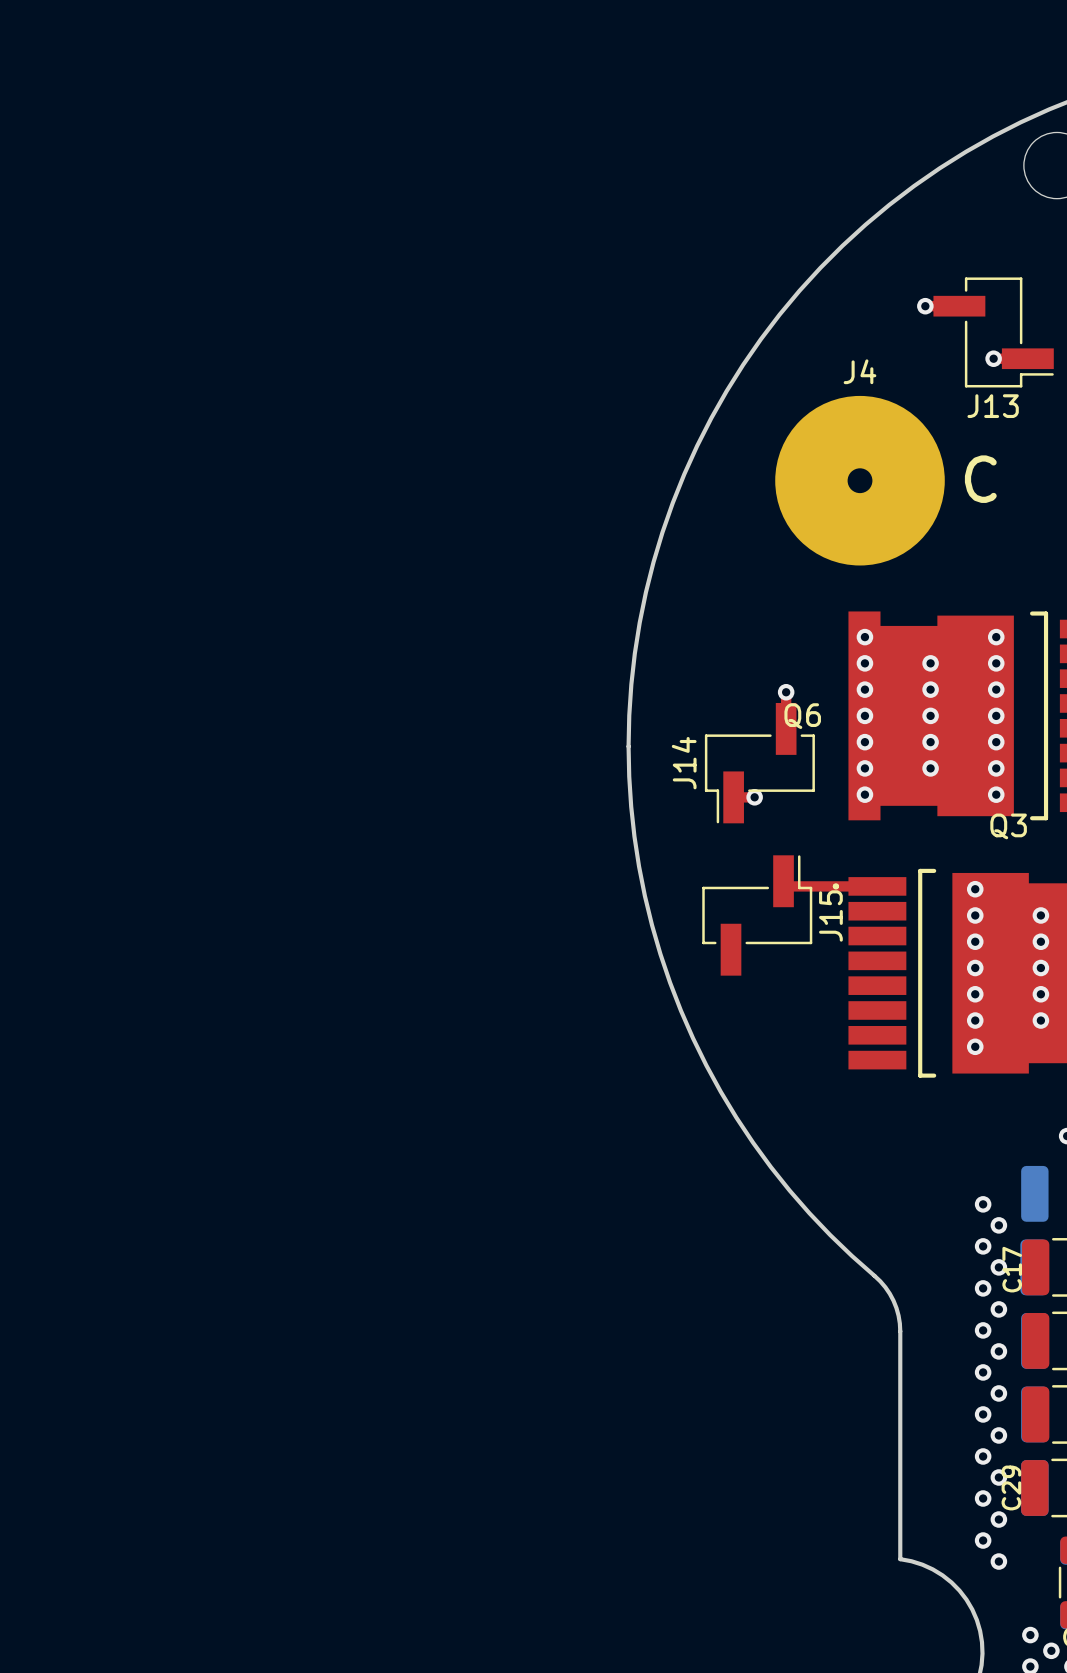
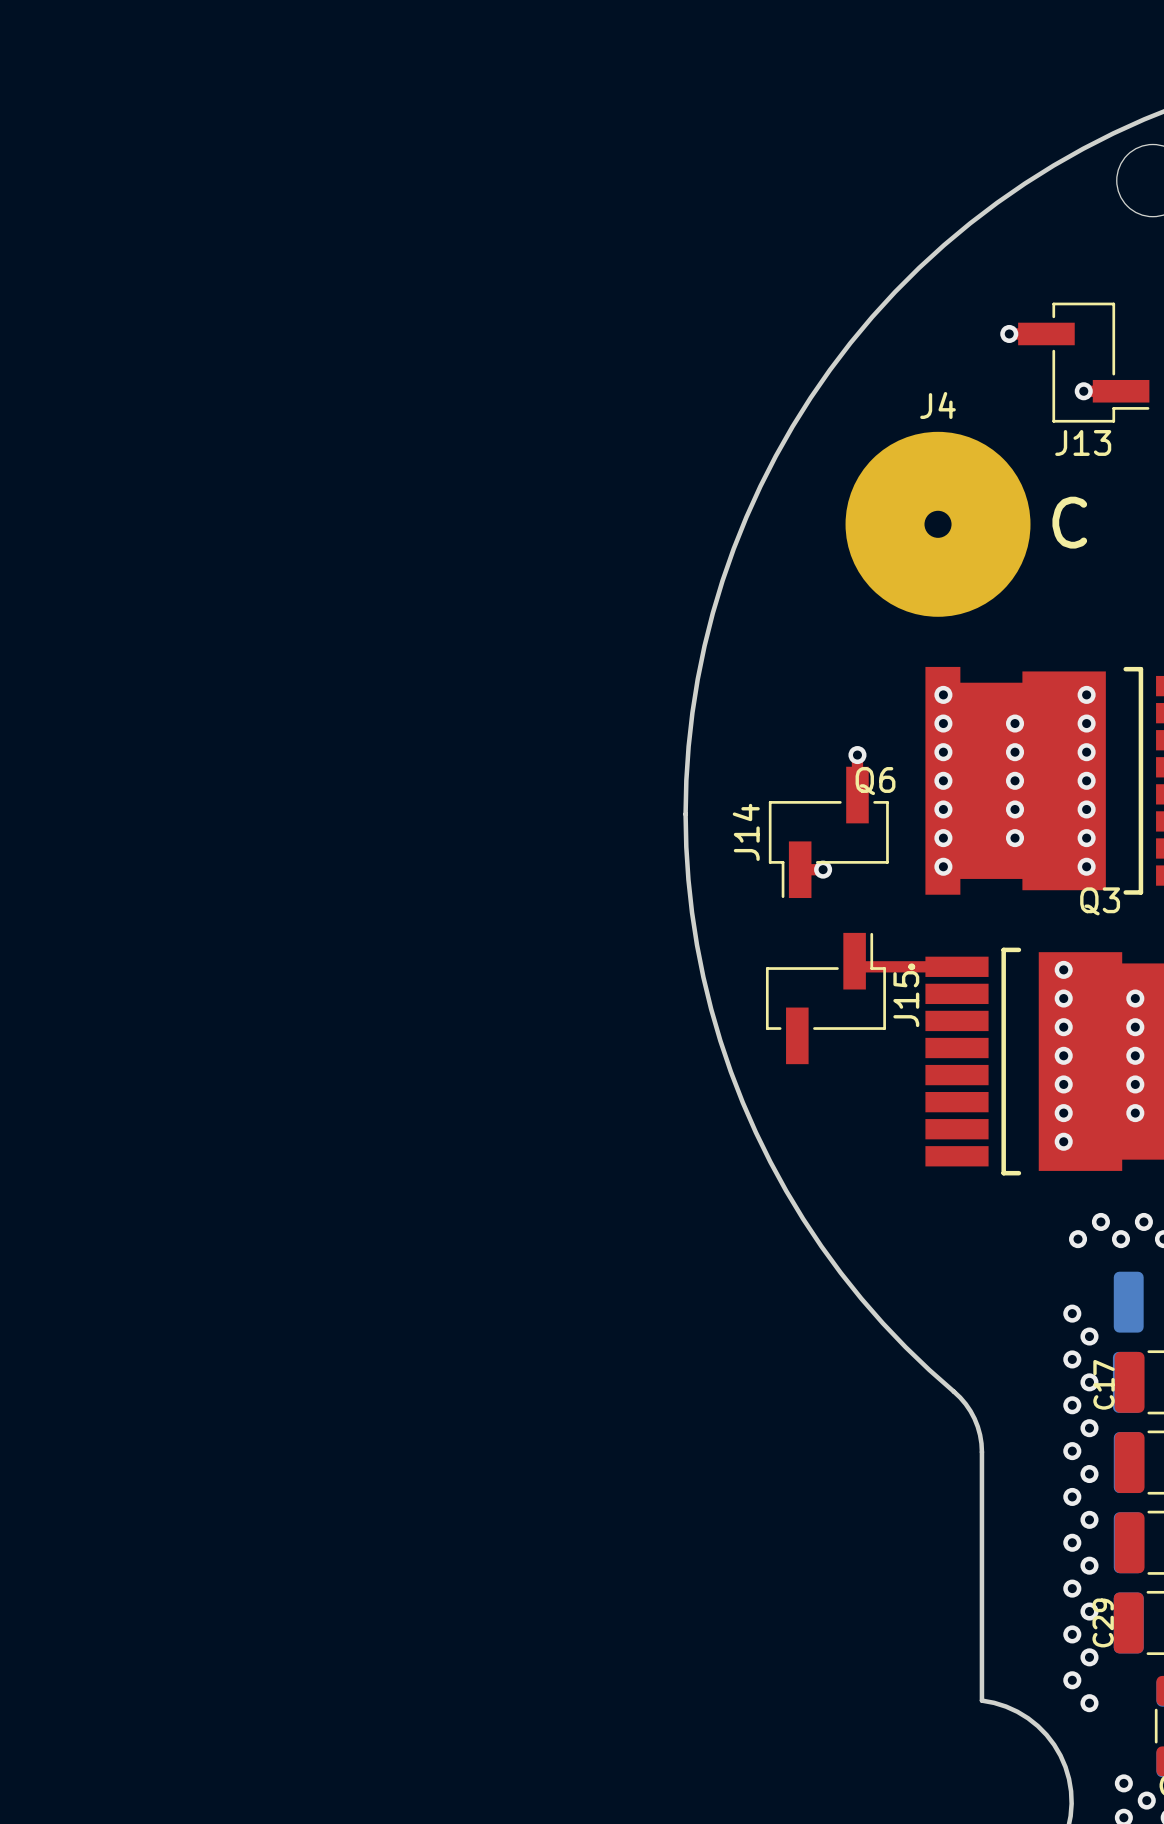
via: none -> (1100, 1221)
via: none -> (1143, 1221)
via: none -> (1078, 1239)
via: none -> (1121, 1239)

